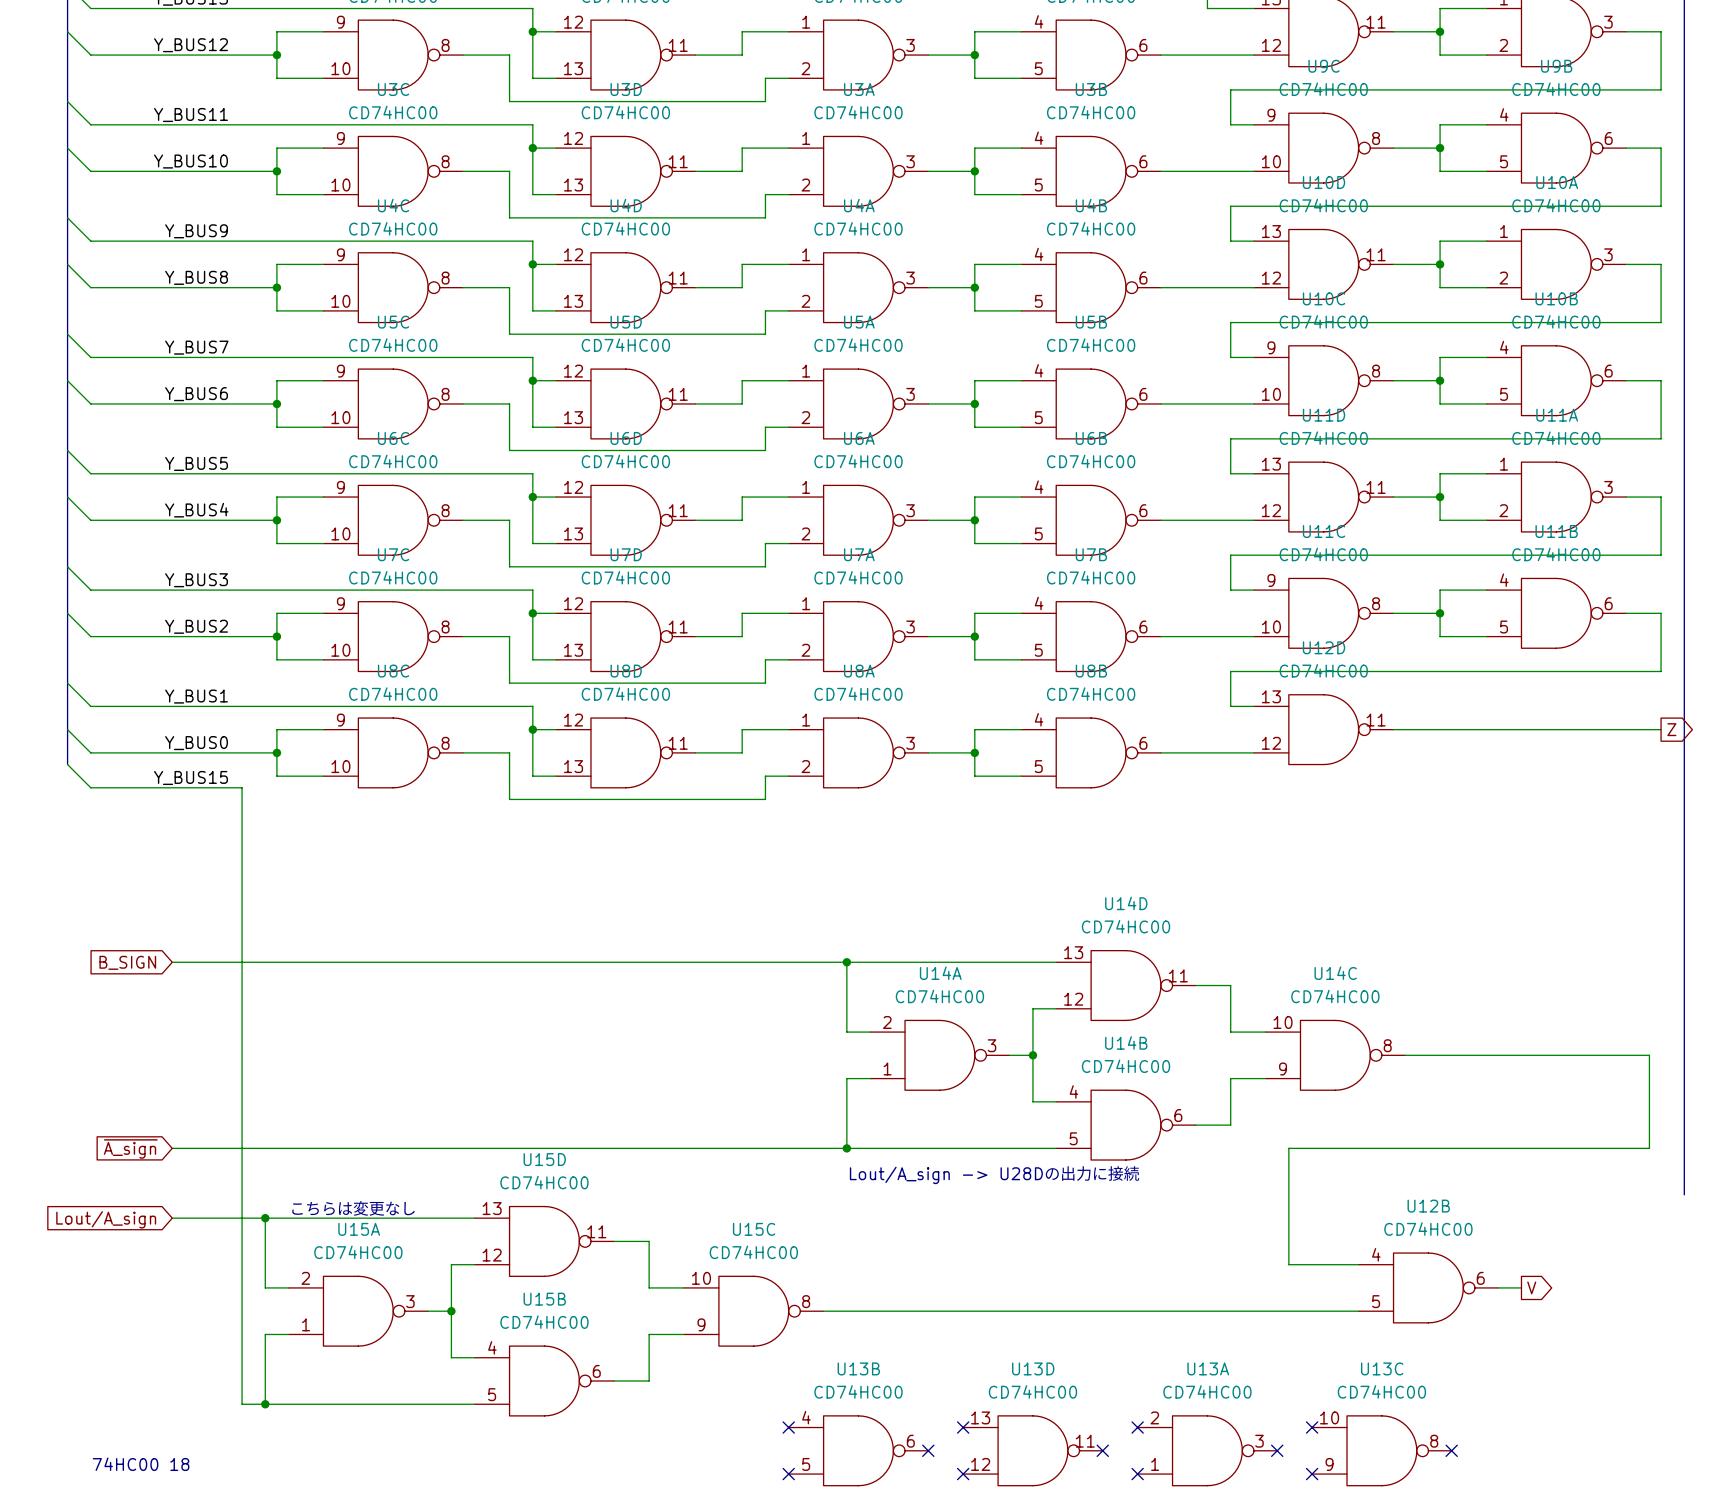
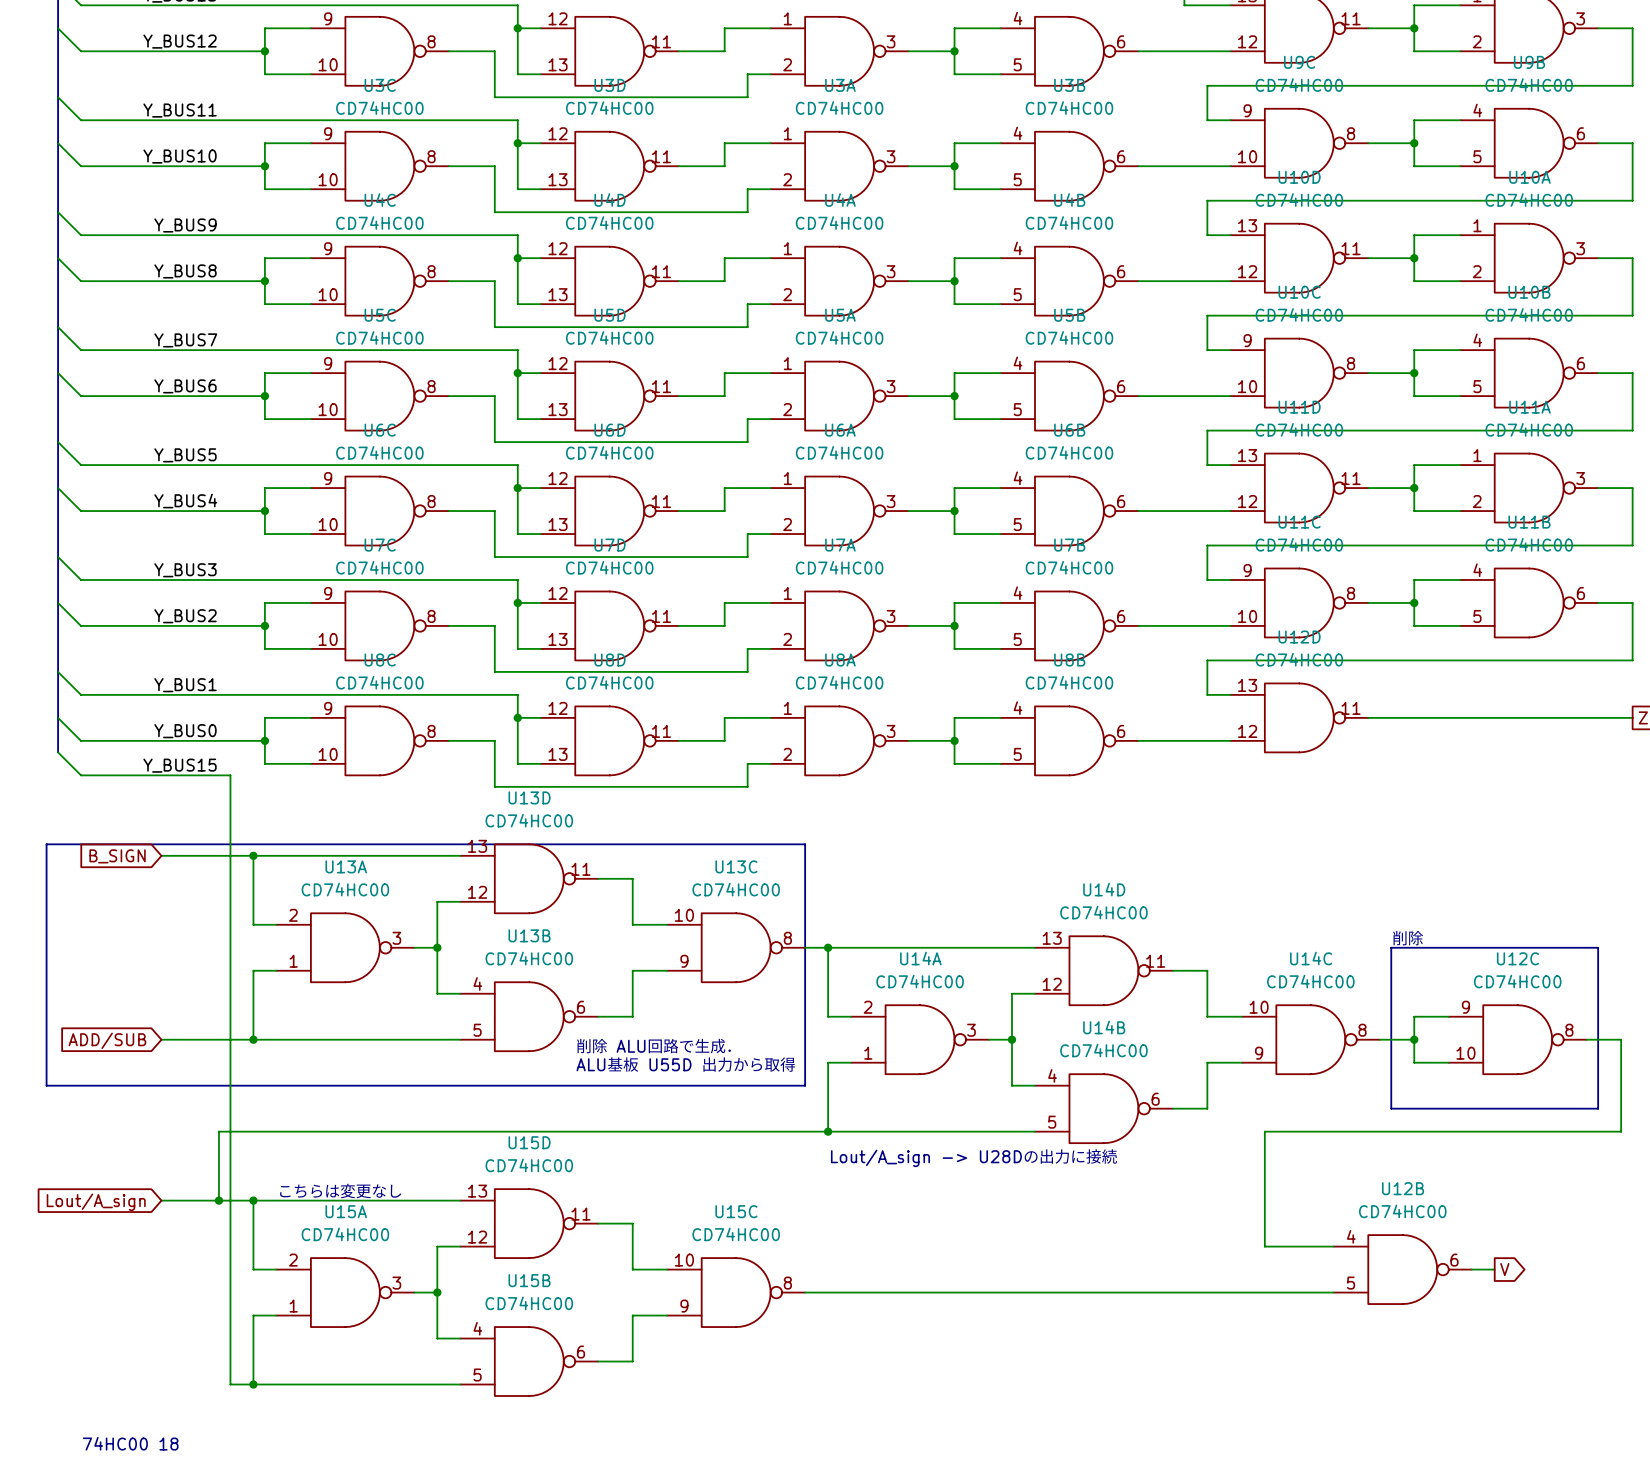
line: none -> (46, 844) (46, 1085) (805, 1085) (805, 844) (46, 844)
wire: none -> (161, 855) (460, 855)
wire: none -> (253, 855) (253, 924) (276, 924)
junction: none -> (253, 855)
wire: none -> (598, 878) (632, 878) (632, 924) (667, 924)
wire: none -> (460, 901) (437, 901) (437, 993) (460, 993)
text: none -> 削除 (1408, 938)
global label position: B_SIGN (127, 962) -> B_SIGN (117, 856)
wire: (172, 962) (428, 962) -> none
wire: (451, 962) (823, 962) -> none
junction: none -> (437, 947)
line: none -> (1391, 947) (1598, 947) (1598, 1108) (1391, 1108) (1391, 947)
wire: none -> (276, 970) (253, 970) (253, 1039)
wire: none -> (667, 970) (632, 970) (632, 1016) (598, 1016)
wire: none -> (1448, 1016) (1414, 1016) (1414, 1062) (1448, 1062)
wire: none -> (161, 1039) (460, 1039)
junction: none -> (253, 1039)
wire: (1440, 1055) (1614, 1055) -> none
junction: none -> (1414, 1039)
U12C: none -> CD74HC00 (1517, 1039)
global label: none -> ADD/SUB (107, 1040)
text: none -> 削除 ALU回路で生成． (653, 1046)
text: none -> ALU基板 U55D 出力から取得 (686, 1064)
global label: ~{A_sign} (130, 1148) -> none
wire: (172, 1148) (230, 1148) -> (218, 1200) (218, 1131)
junction: none -> (218, 1200)
no-connect mark: (788, 1427) -> none
no-connect mark: (963, 1427) -> none
no-connect mark: (1137, 1427) -> none
no-connect mark: (1312, 1427) -> none
U13B position: (858, 1450) -> (529, 1016)
no-connect mark: (928, 1450) -> none
U13D position: (1032, 1450) -> (529, 878)
no-connect mark: (1102, 1450) -> none
U13A position: (1207, 1450) -> (345, 947)
no-connect mark: (1277, 1450) -> none
U13C position: (1381, 1450) -> (736, 947)
no-connect mark: (1451, 1450) -> none
no-connect mark: (788, 1474) -> none
no-connect mark: (963, 1474) -> none
no-connect mark: (1137, 1474) -> none
no-connect mark: (1312, 1474) -> none

